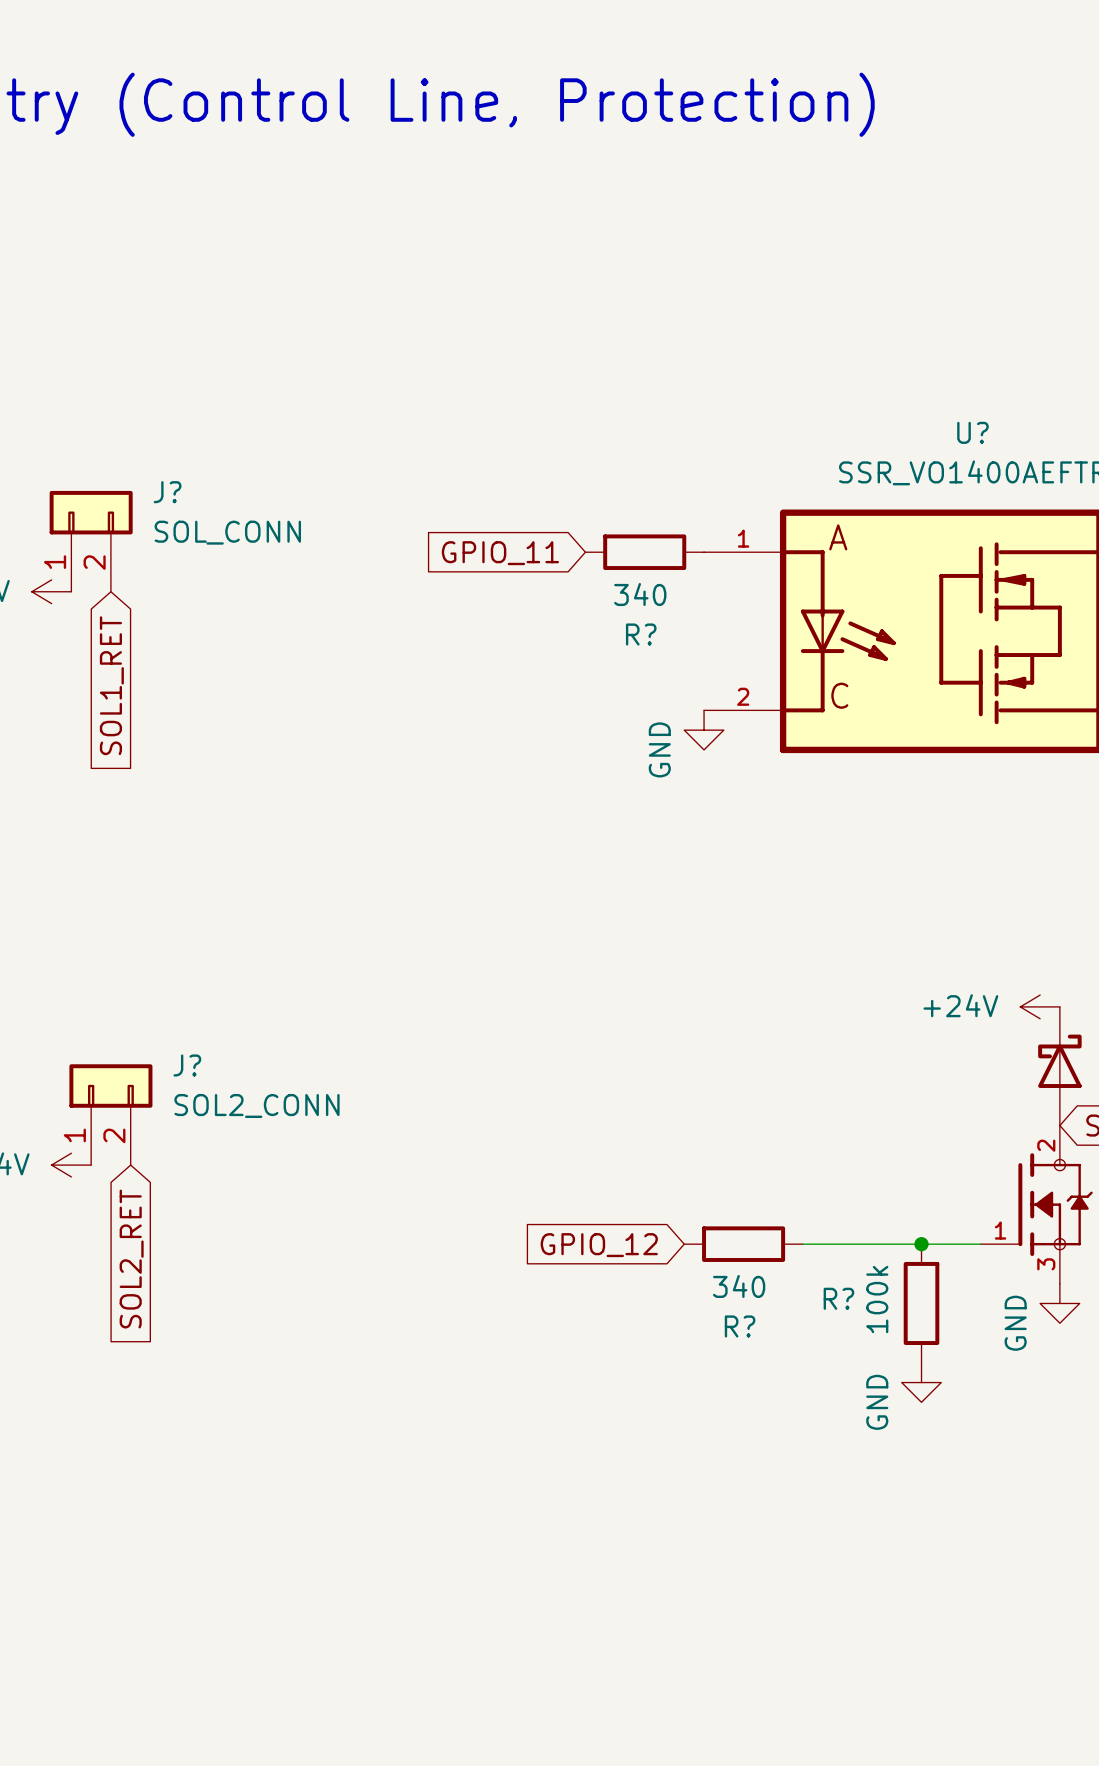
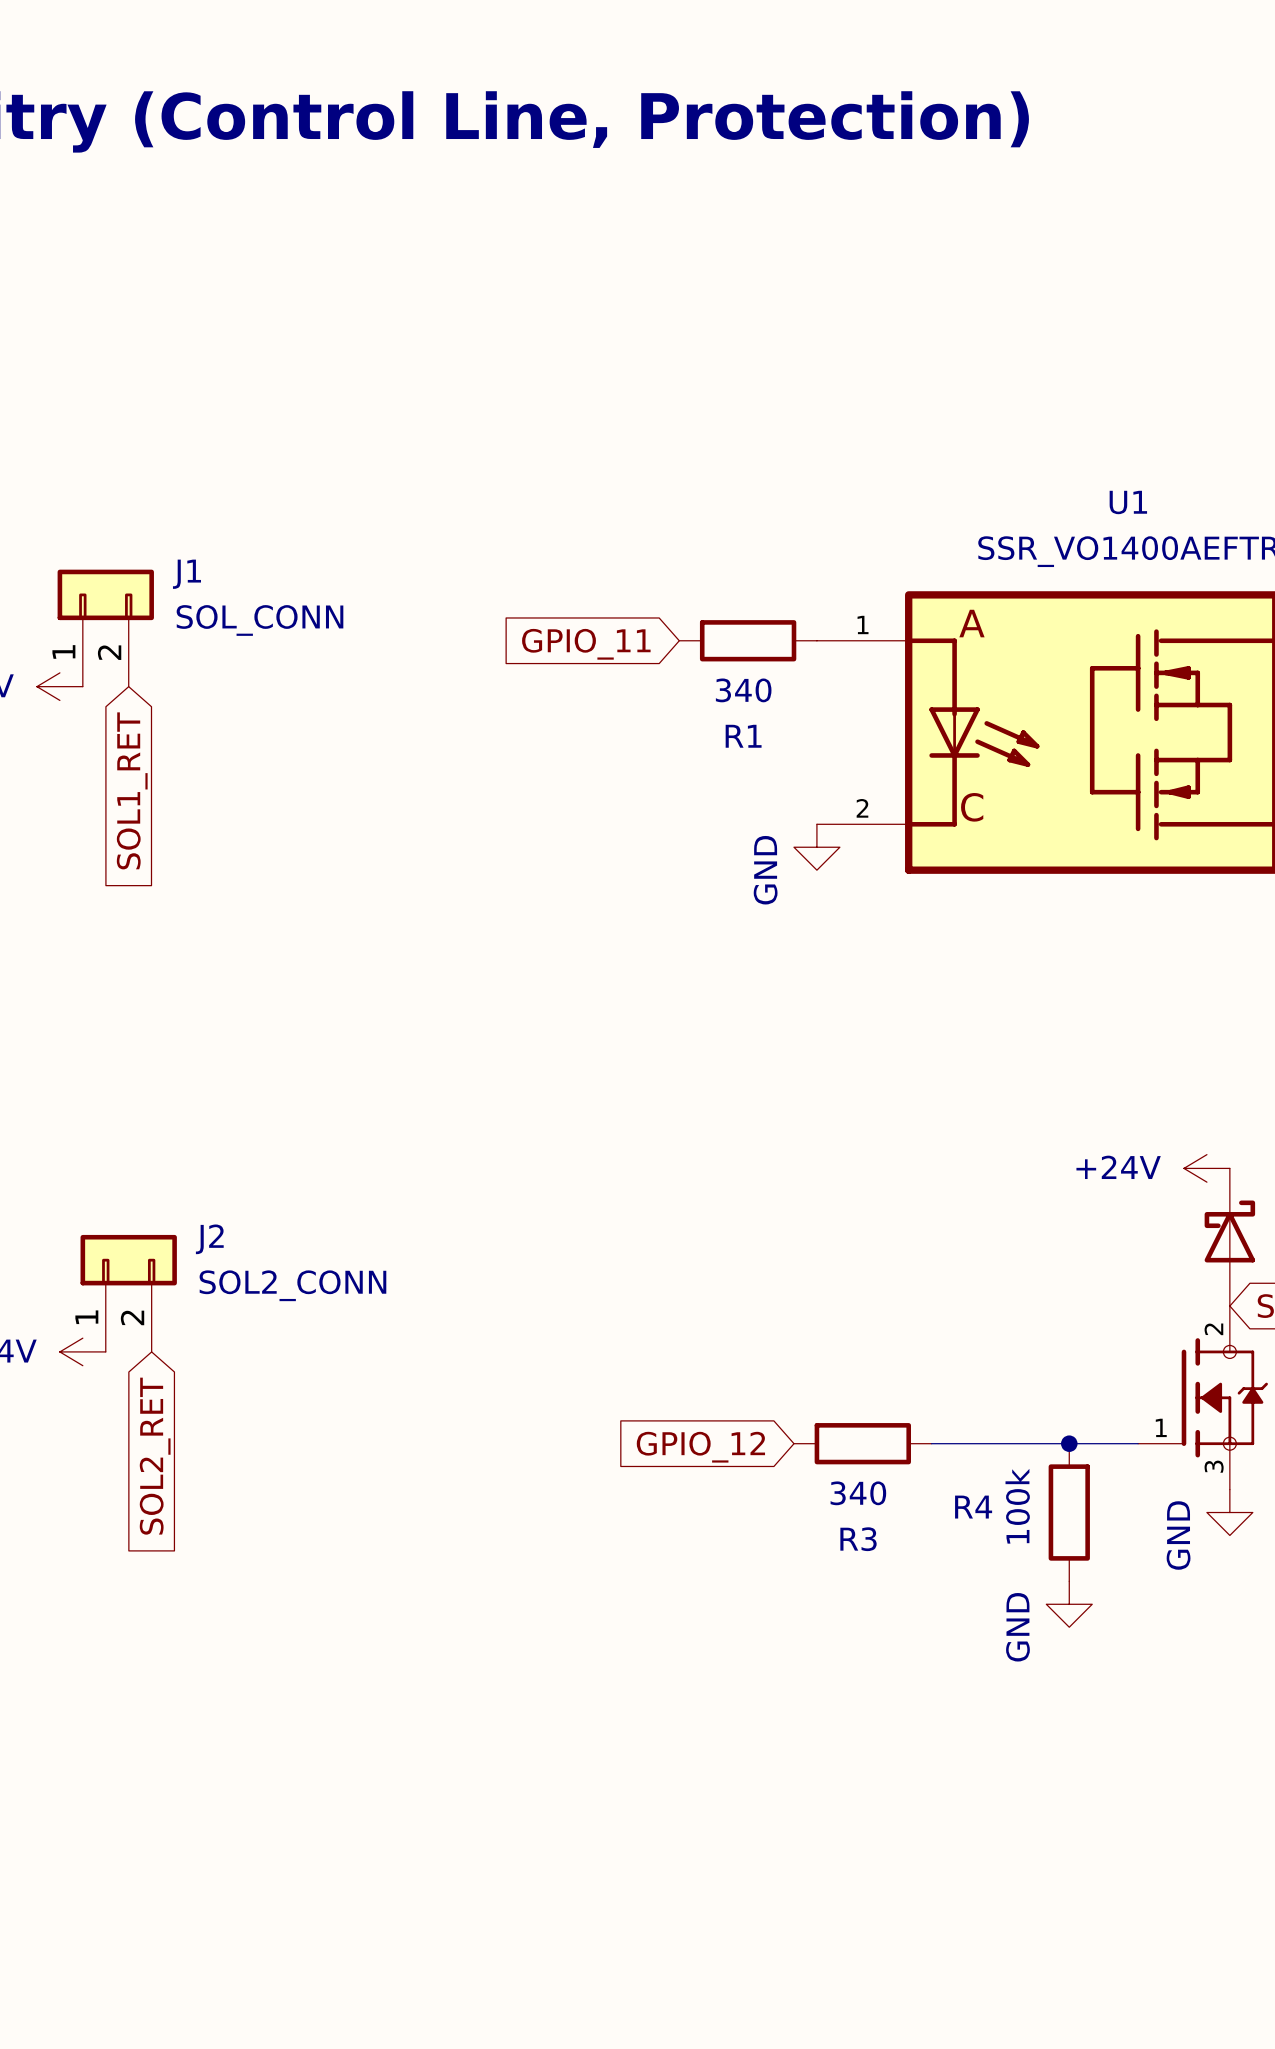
U? name: U? (972, 432) -> U1 (1128, 502)
J? name: J? (167, 492) -> J1 (186, 574)
R? name: R? (641, 634) -> R1 (743, 736)
J? name: J? (187, 1065) -> J2 (209, 1239)
R? name: R? (838, 1298) -> R4 (973, 1507)
R? name: R? (740, 1326) -> R3 (858, 1539)

